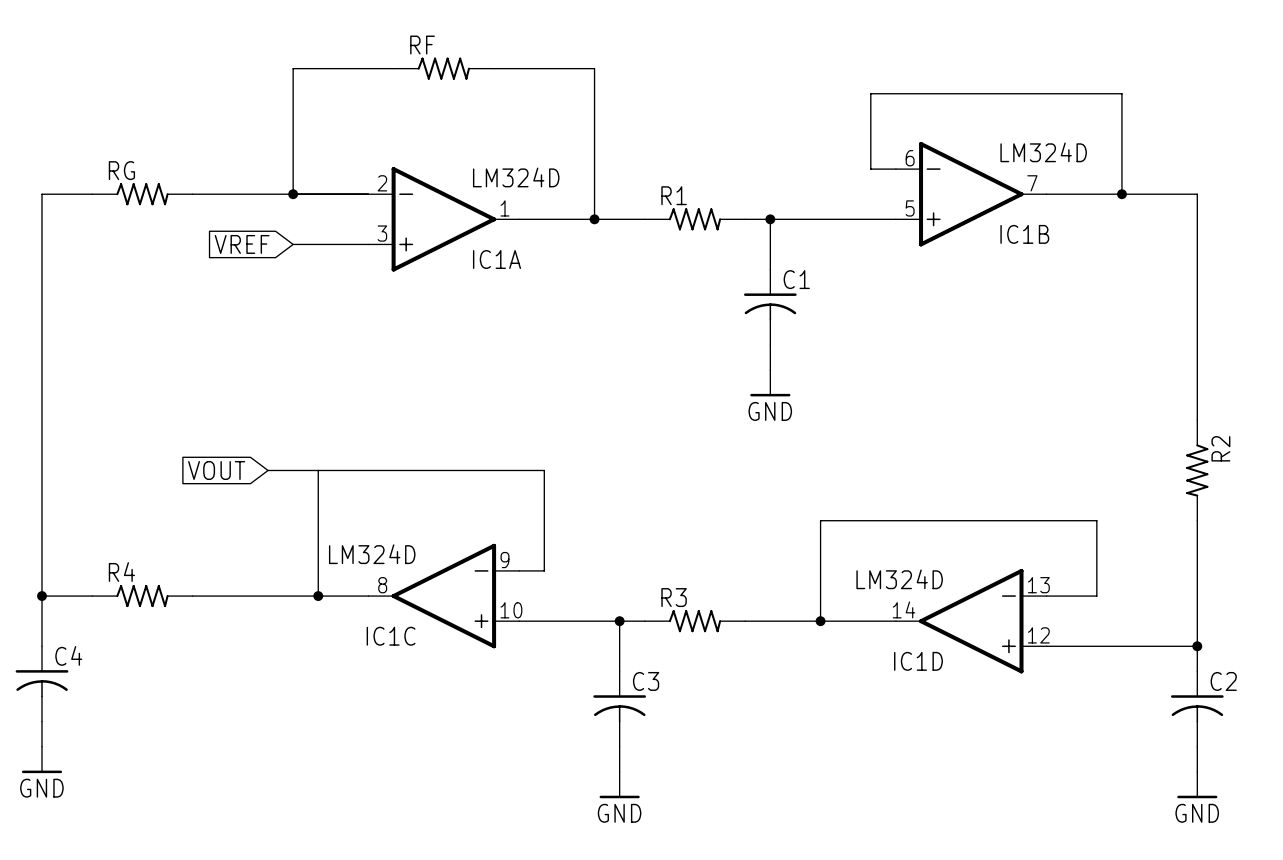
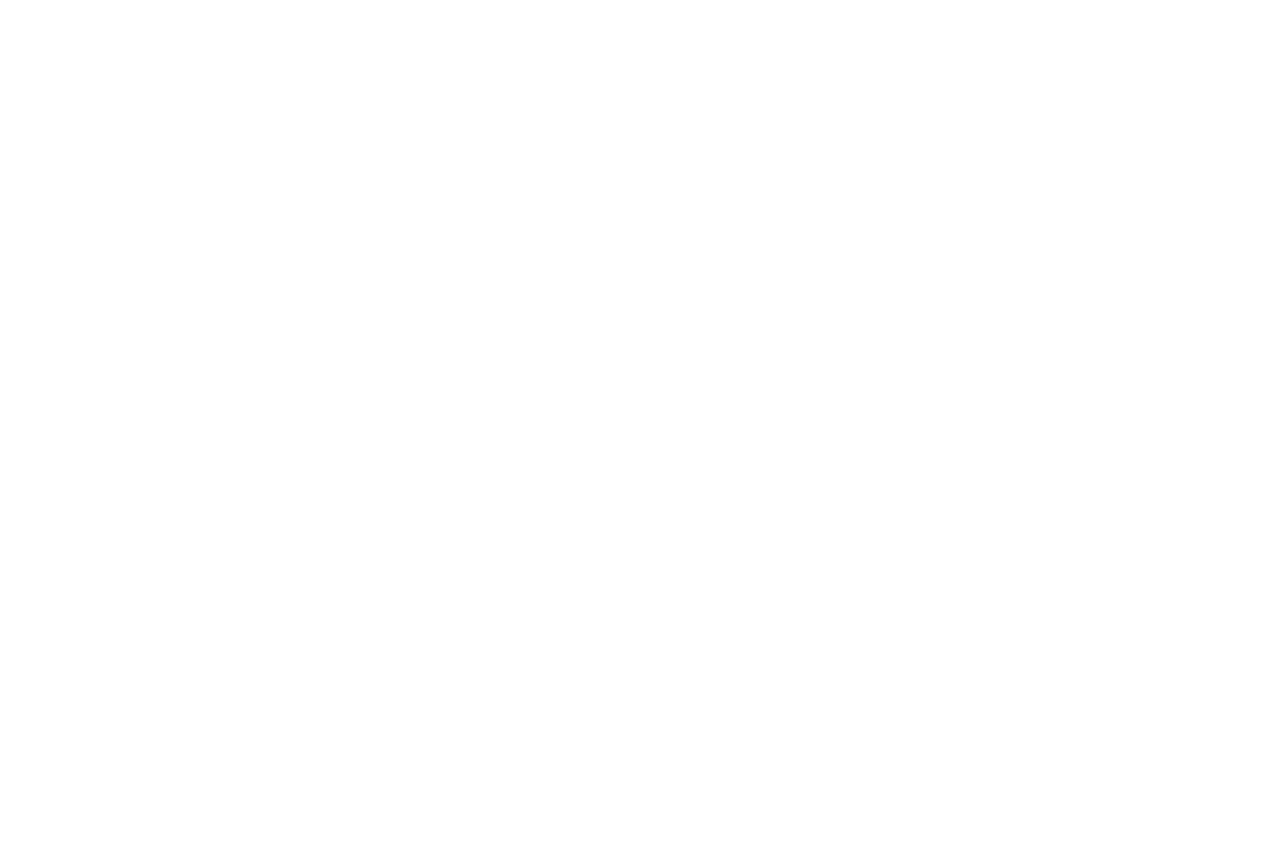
wire: (393, 68) (293, 68) (293, 194) -> none
RF: (443, 68) -> none
wire: (494, 68) (594, 68) (594, 219) -> none
wire: (895, 169) (870, 169) (870, 93) (1121, 93) (1121, 194) -> none
wire: (92, 194) (42, 194) (42, 646) -> none
RG: (142, 194) -> none
wire: (192, 194) (368, 194) -> none
junction: (293, 194) -> none
IC1B: LM324D (971, 194) -> none
wire: (1046, 194) (1197, 194) (1197, 420) -> none
junction: (1121, 194) -> none
IC1A: LM324D (443, 219) -> none
wire: (519, 219) (644, 219) -> none
junction: (594, 219) -> none
R1: (695, 219) -> none
wire: (745, 219) (895, 219) -> none
wire: (770, 219) (770, 269) -> none
junction: (770, 219) -> none
global label: VREF (242, 244) -> none
wire: (293, 244) (368, 244) -> none
C1: (770, 307) -> none
wire: (770, 344) (770, 370) -> none
power symbol: GND (770, 383) -> none
global label: VOUT (216, 470) -> none
wire: (268, 470) (544, 470) (544, 570) (519, 570) -> none
wire: (318, 470) (318, 596) -> none
R2: (1197, 470) -> none
wire: (1197, 520) (1197, 671) -> none
wire: (42, 596) (92, 596) -> none
junction: (42, 596) -> none
R4: (142, 596) -> none
wire: (192, 596) (368, 596) -> none
junction: (318, 596) -> none
IC1C: LM324D (443, 596) -> none
wire: (1046, 596) (1096, 596) (1096, 520) (820, 520) (820, 621) -> none
wire: (519, 621) (644, 621) -> none
wire: (619, 621) (619, 671) -> none
junction: (619, 621) -> none
R3: (695, 621) -> none
wire: (745, 621) (895, 621) -> none
junction: (820, 621) -> none
IC1D: LM324D (971, 621) -> none
wire: (1046, 646) (1197, 646) -> none
junction: (1197, 646) -> none
C4: (42, 683) -> none
C3: (619, 709) -> none
C2: (1197, 709) -> none
wire: (42, 721) (42, 746) -> none
wire: (619, 746) (619, 771) -> none
wire: (1197, 746) (1197, 771) -> none
power symbol: GND (42, 759) -> none
power symbol: GND (619, 785) -> none
power symbol: GND (1197, 785) -> none

